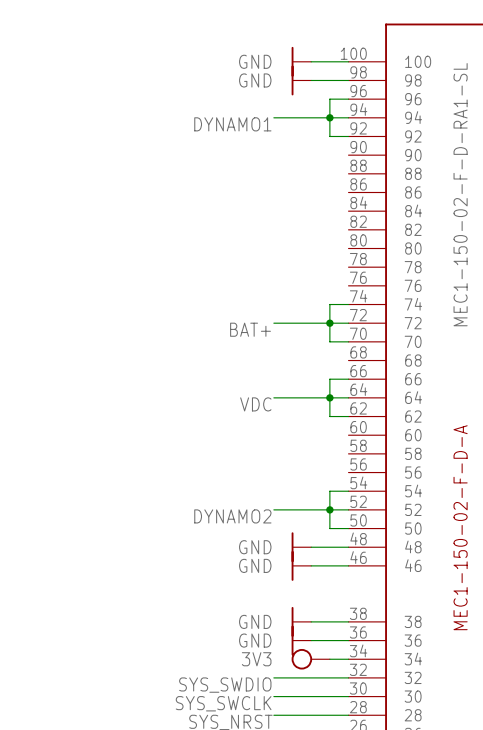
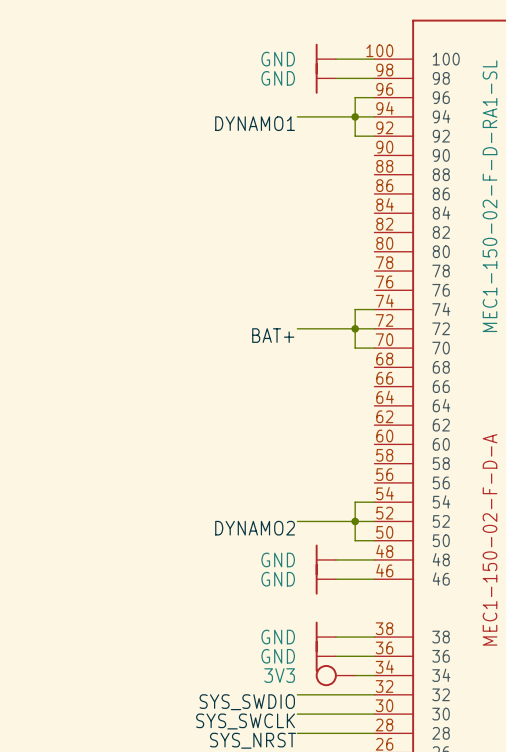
wire: (348, 379) (329, 379) (329, 416) (348, 416) -> none
wire: (273, 397) (348, 397) -> none
junction: (329, 397) -> none
label: VDC (255, 404) -> none

